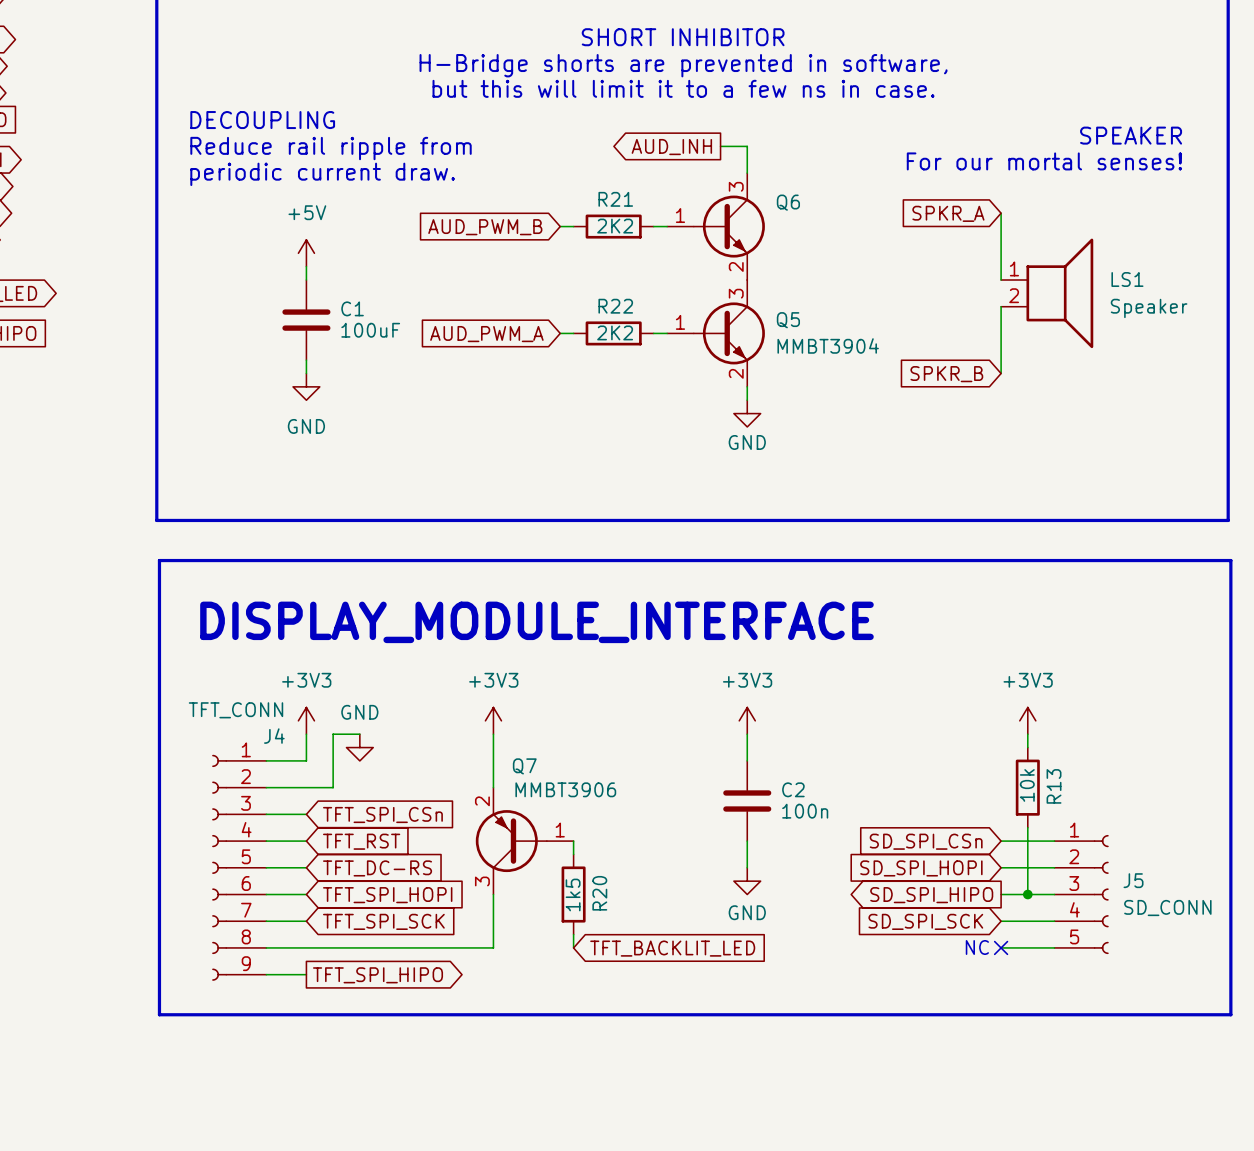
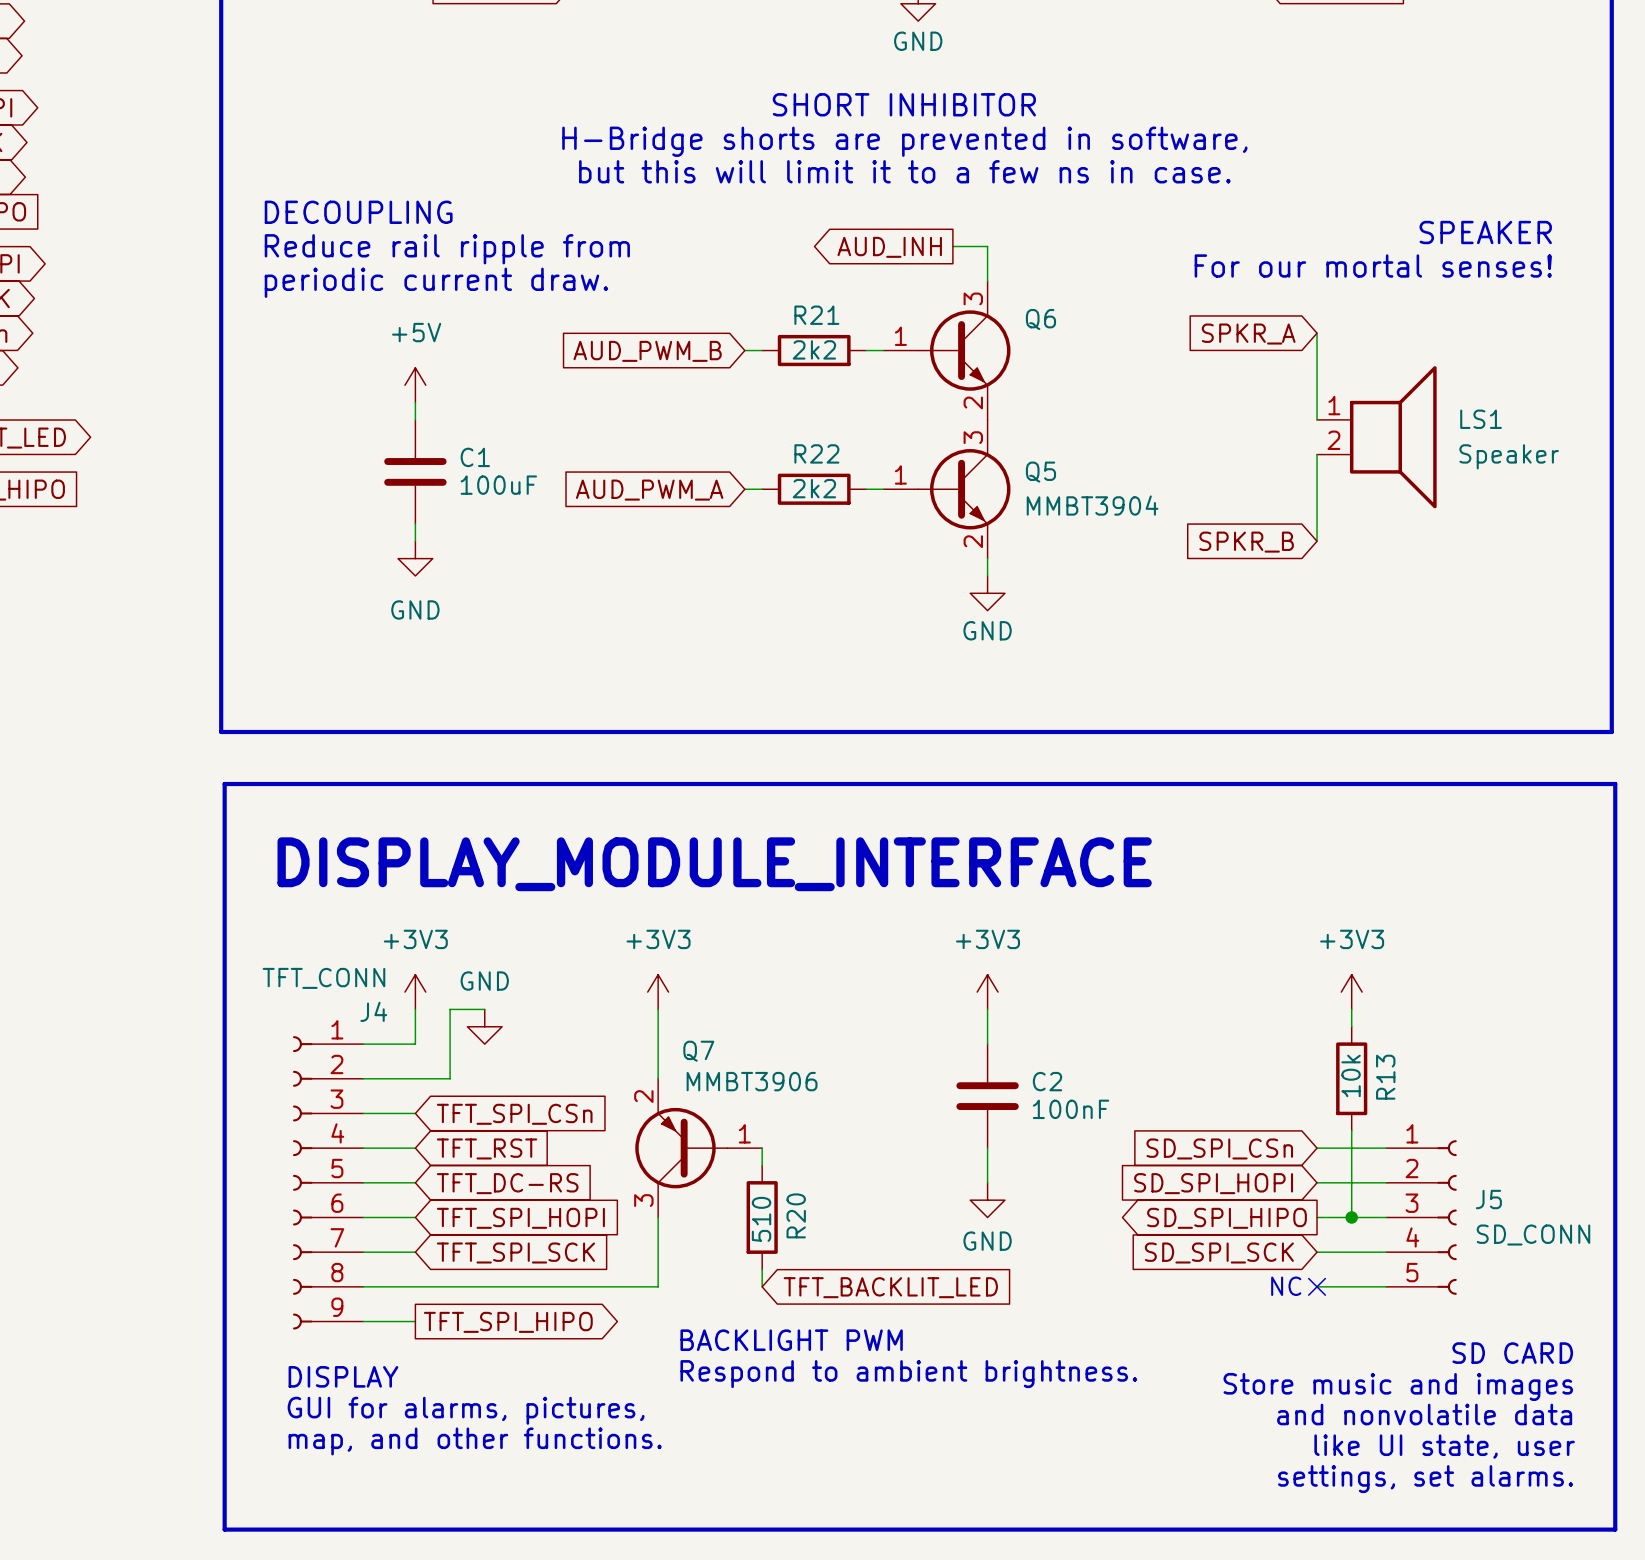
R21 value: 2K2 (615, 226) -> 2k2 (814, 349)
R22 value: 2K2 (615, 332) -> 2k2 (814, 488)
C2 value: 100n (805, 811) -> 100nF (1071, 1109)
R20 value: 1k5 (573, 895) -> 510 (761, 1219)
text: none -> BACKLIGHT PWM (791, 1340)
text: none -> SD CARD (1512, 1353)
line: (159, 1014) (1230, 1014) -> (224, 1373) (224, 1529) (1615, 1529) (1615, 1373)
text: none -> Respond to ambient brightness. (908, 1374)
text: none -> DISPLAY (343, 1376)
text: none -> Store music and images (1398, 1386)
text: none -> GUI for alarms, pictures, (466, 1410)
text: none -> and nonvolatile data (1424, 1414)
text: none -> map, and other functions. (475, 1441)
text: none -> like UI state, user (1444, 1446)
text: none -> settings, set alarms. (1425, 1479)

